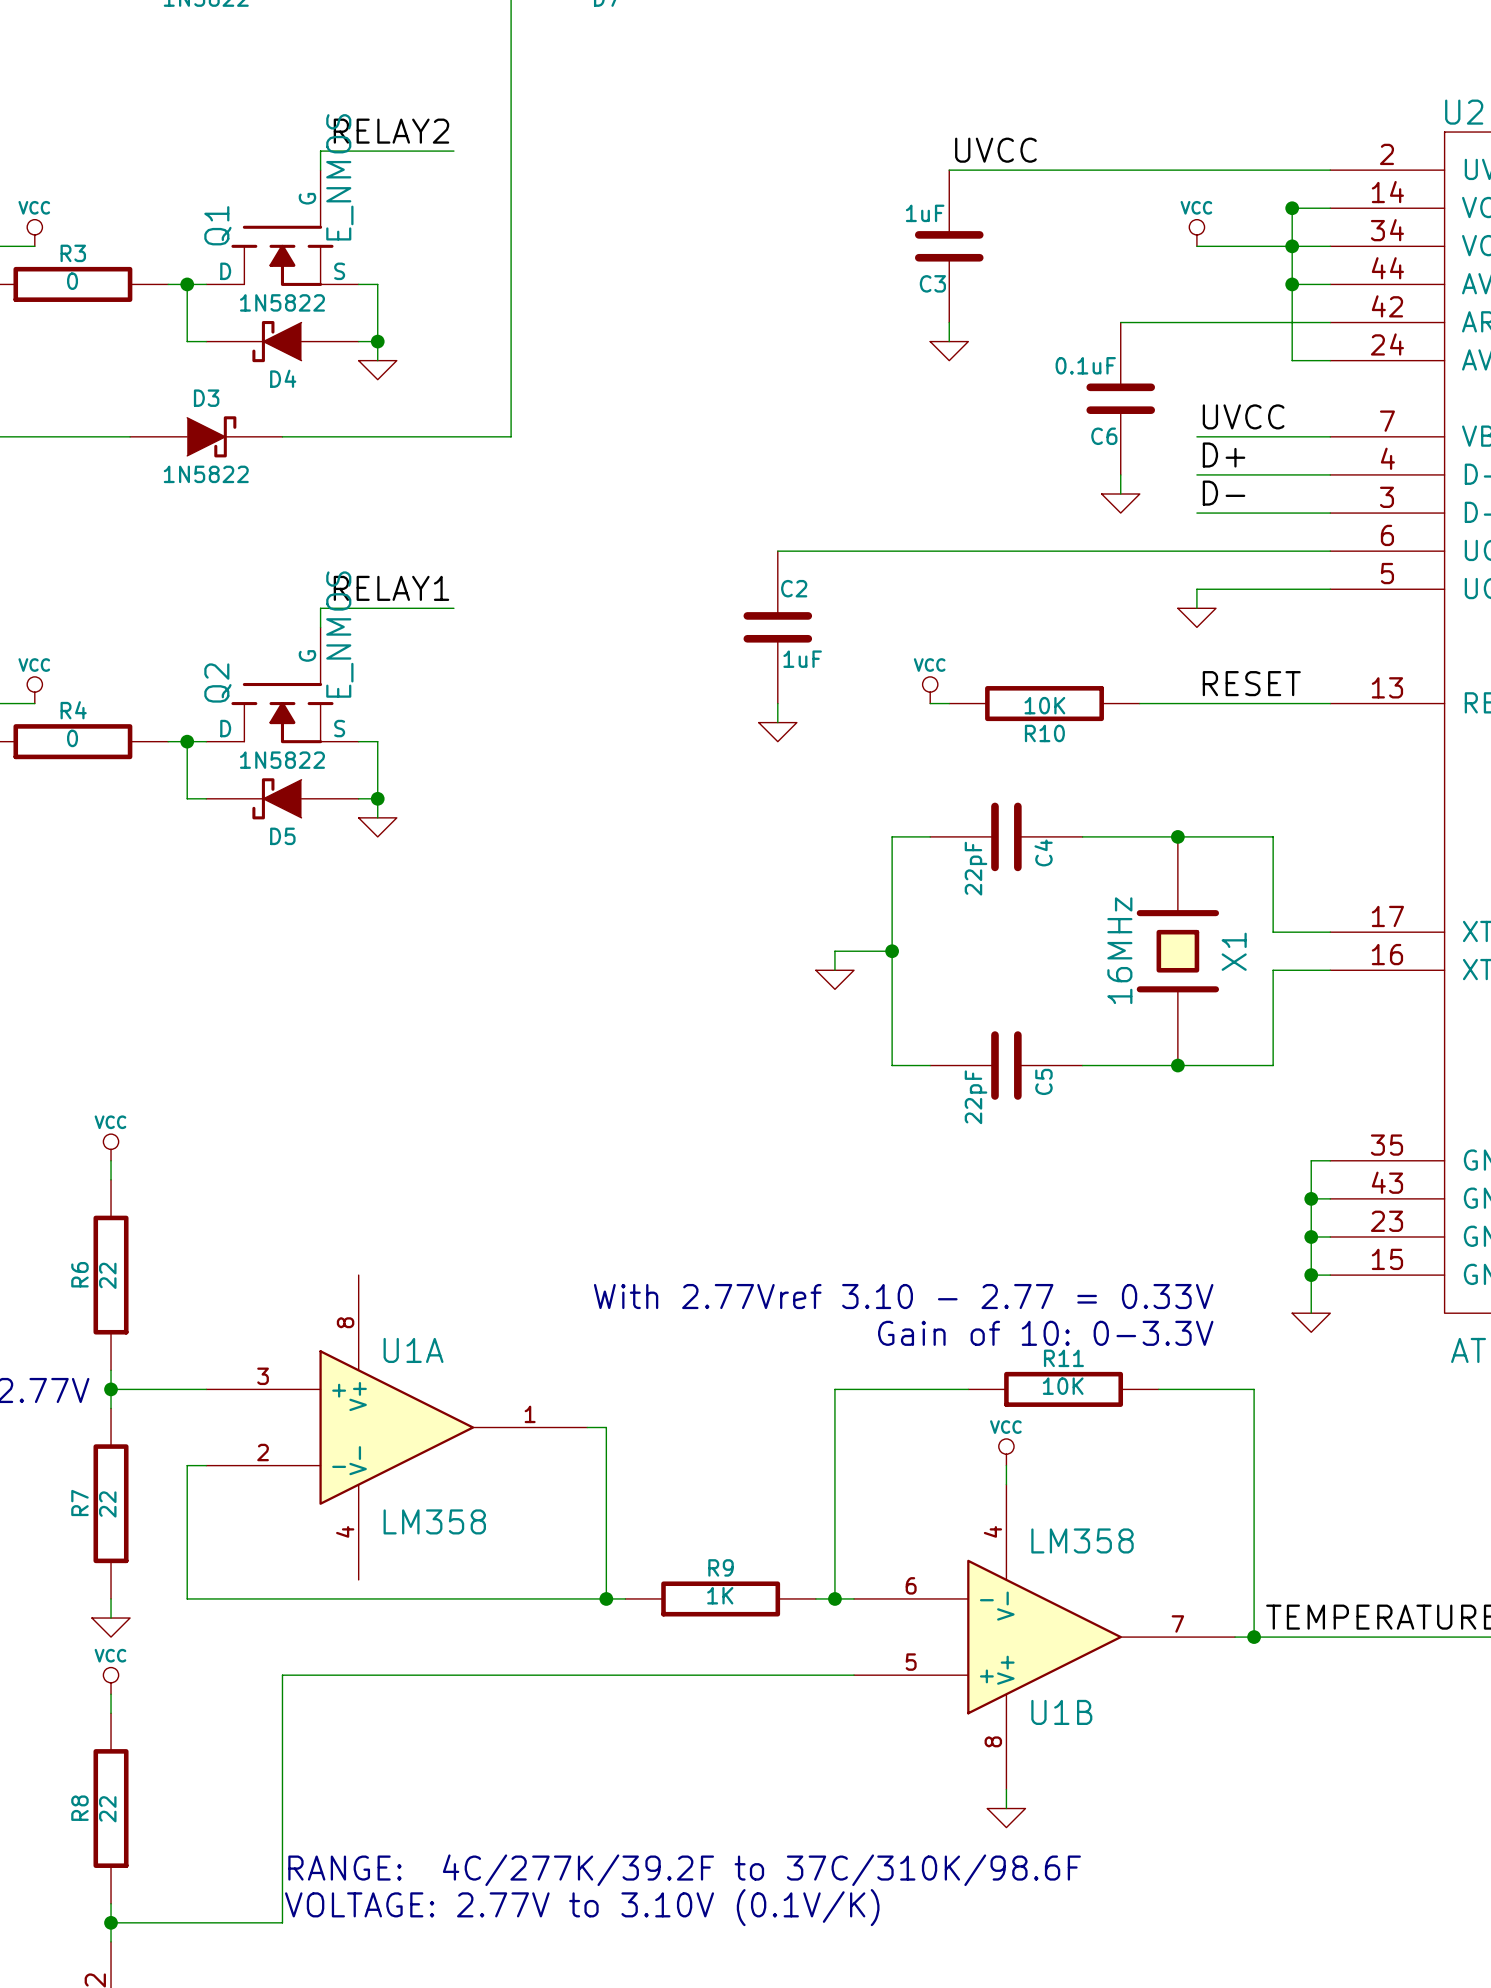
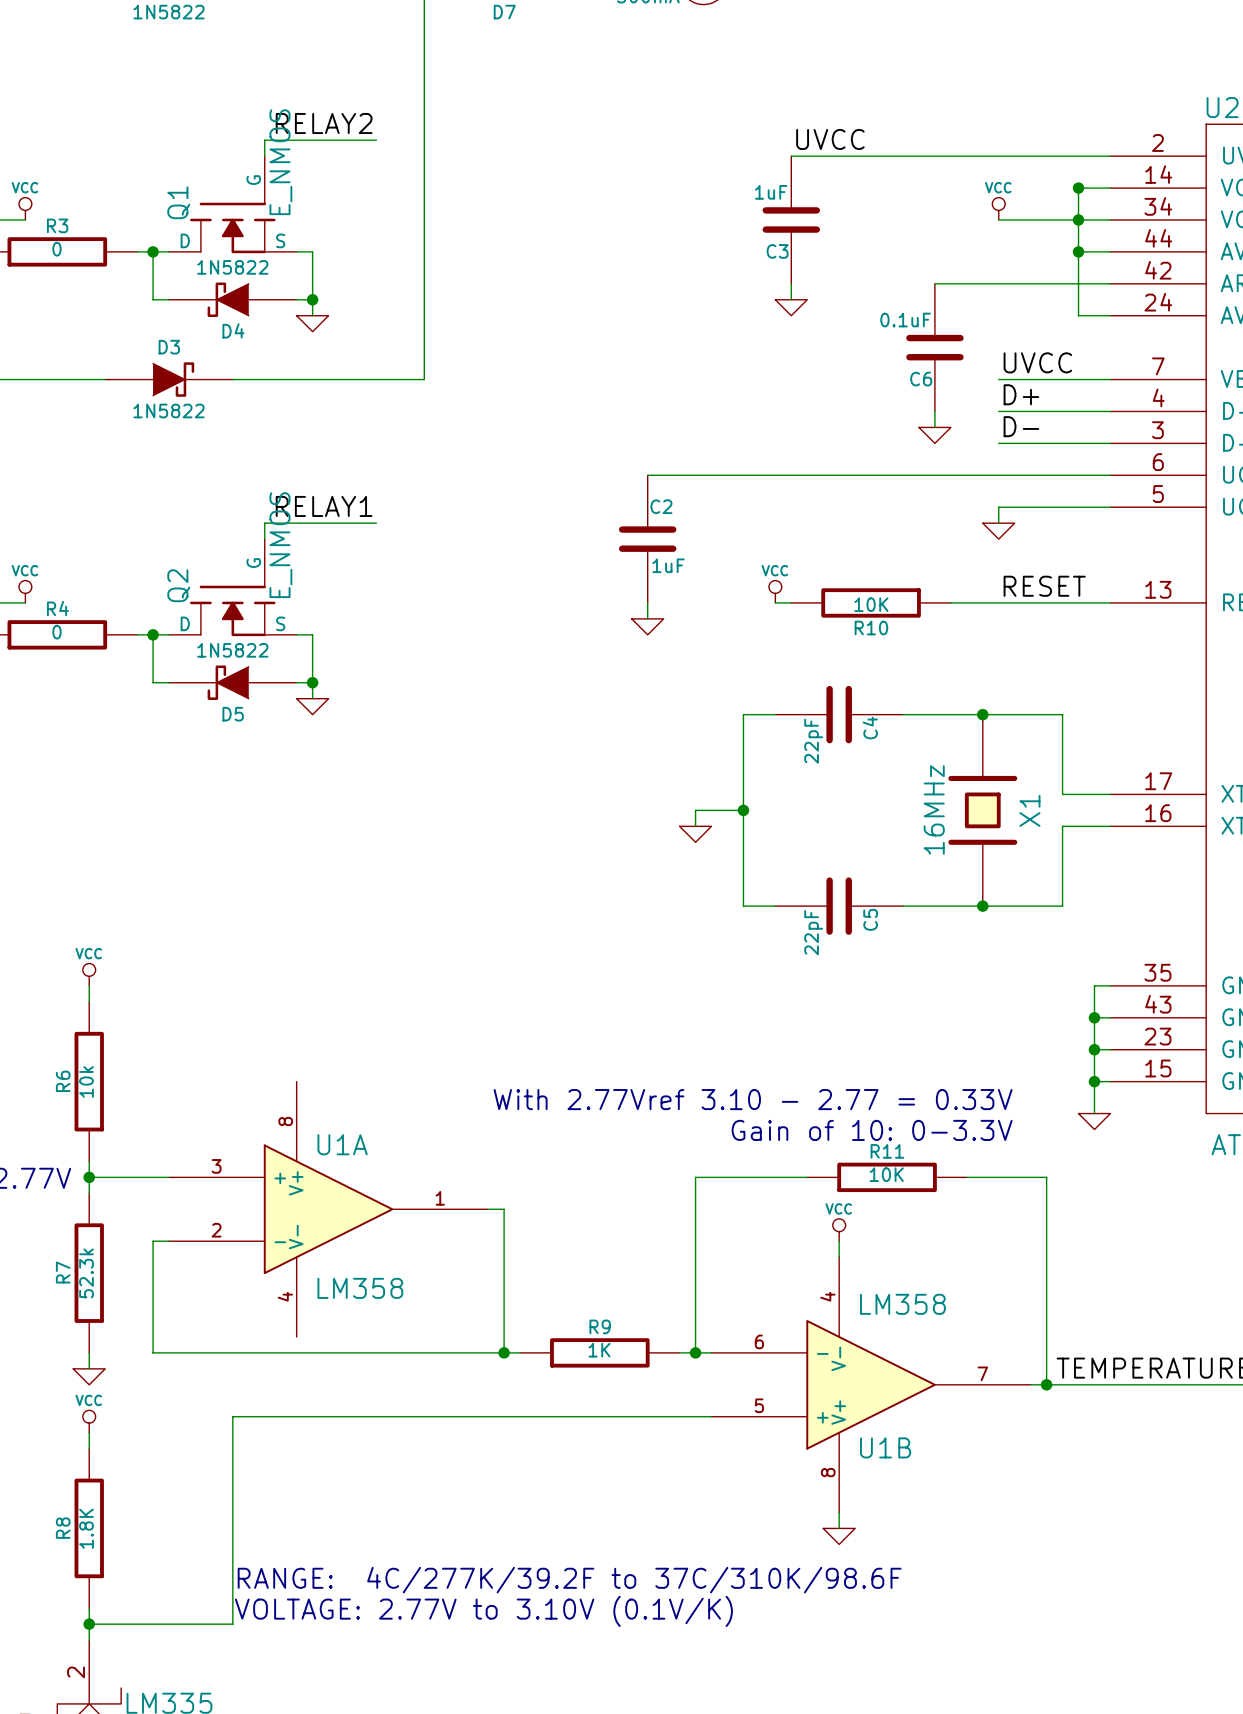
R6 value: 22 (107, 1275) -> 10k (86, 1081)
R7 value: 22 (107, 1504) -> 52.3k (86, 1273)
R8 value: 22 (107, 1809) -> 1.8K (86, 1528)

